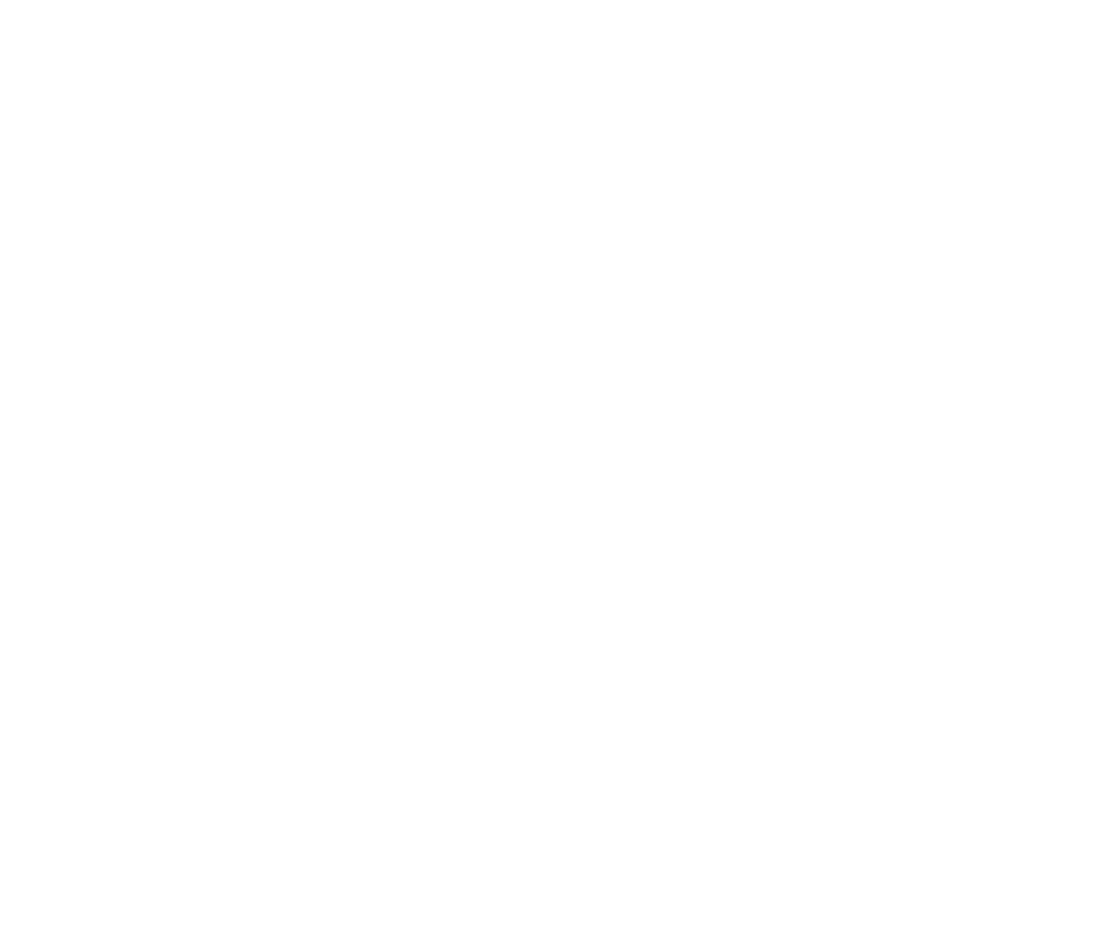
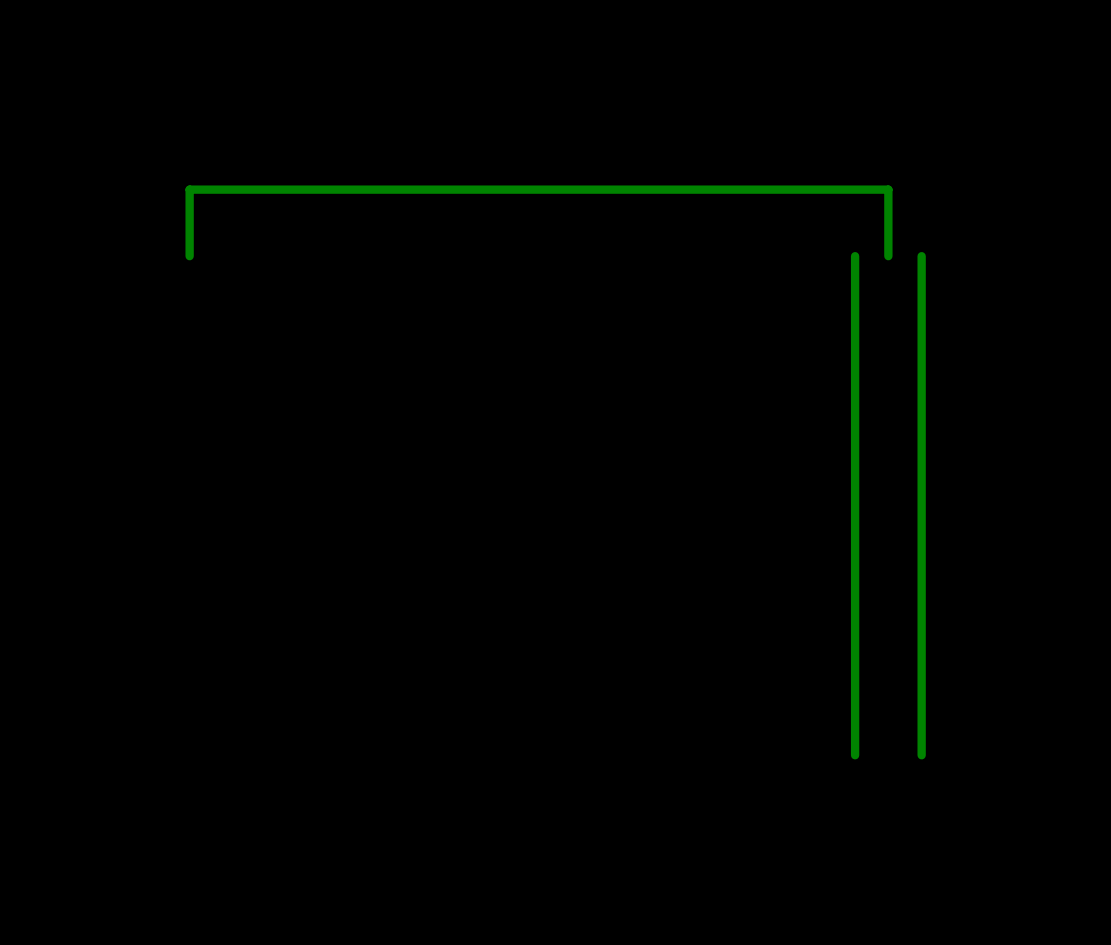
bottom track: none -> (855, 256) (855, 755)
bottom track: none -> (888, 256) (888, 189) (189, 189) (189, 256)
bottom track: none -> (921, 256) (921, 755)

